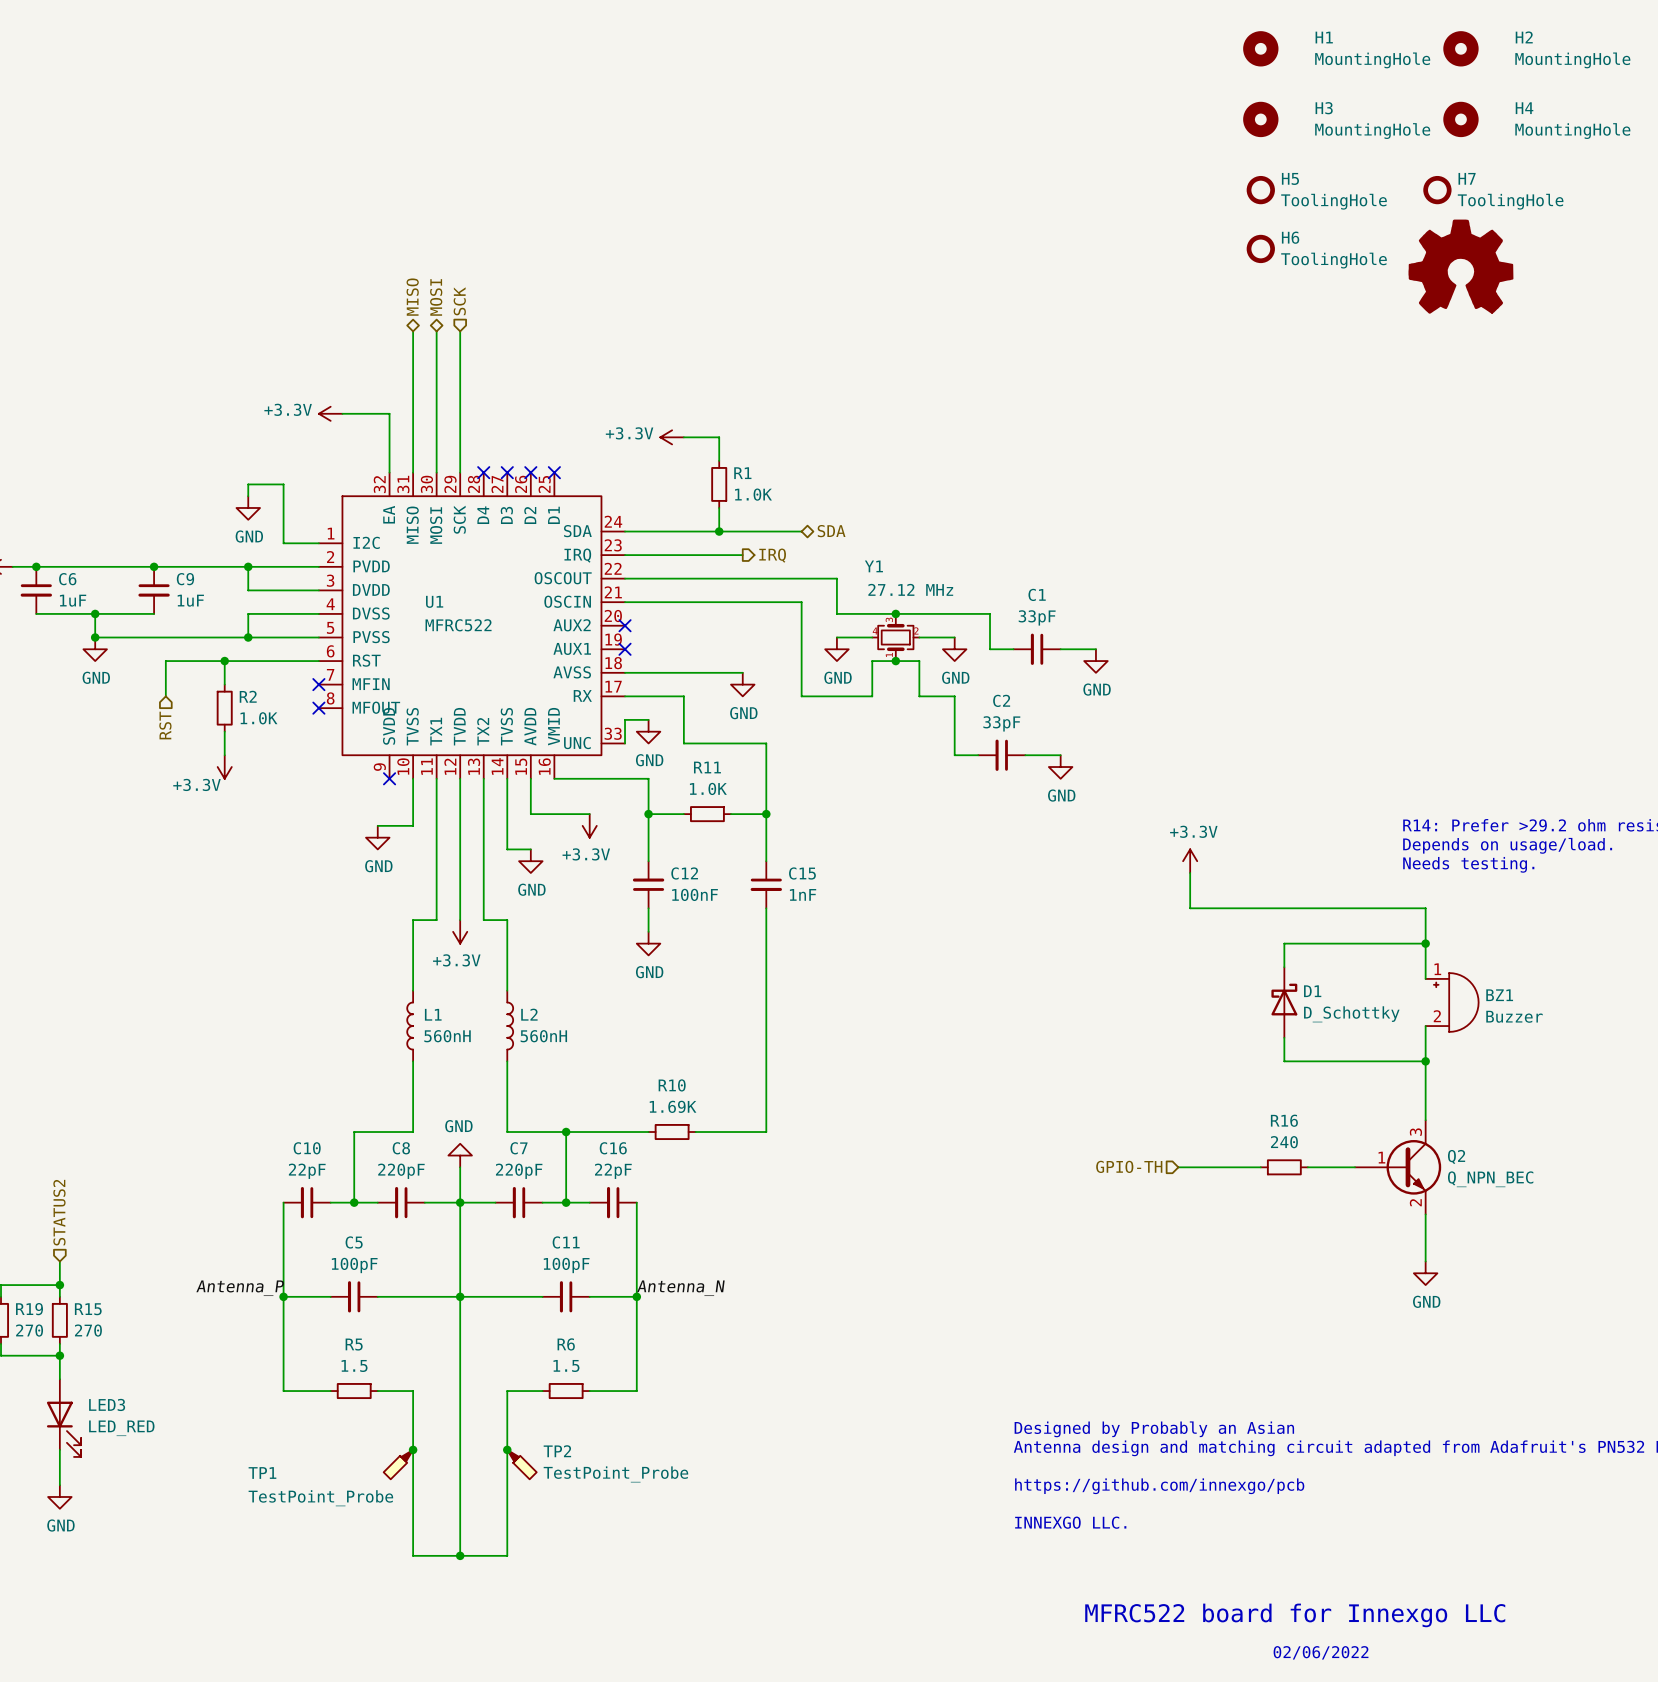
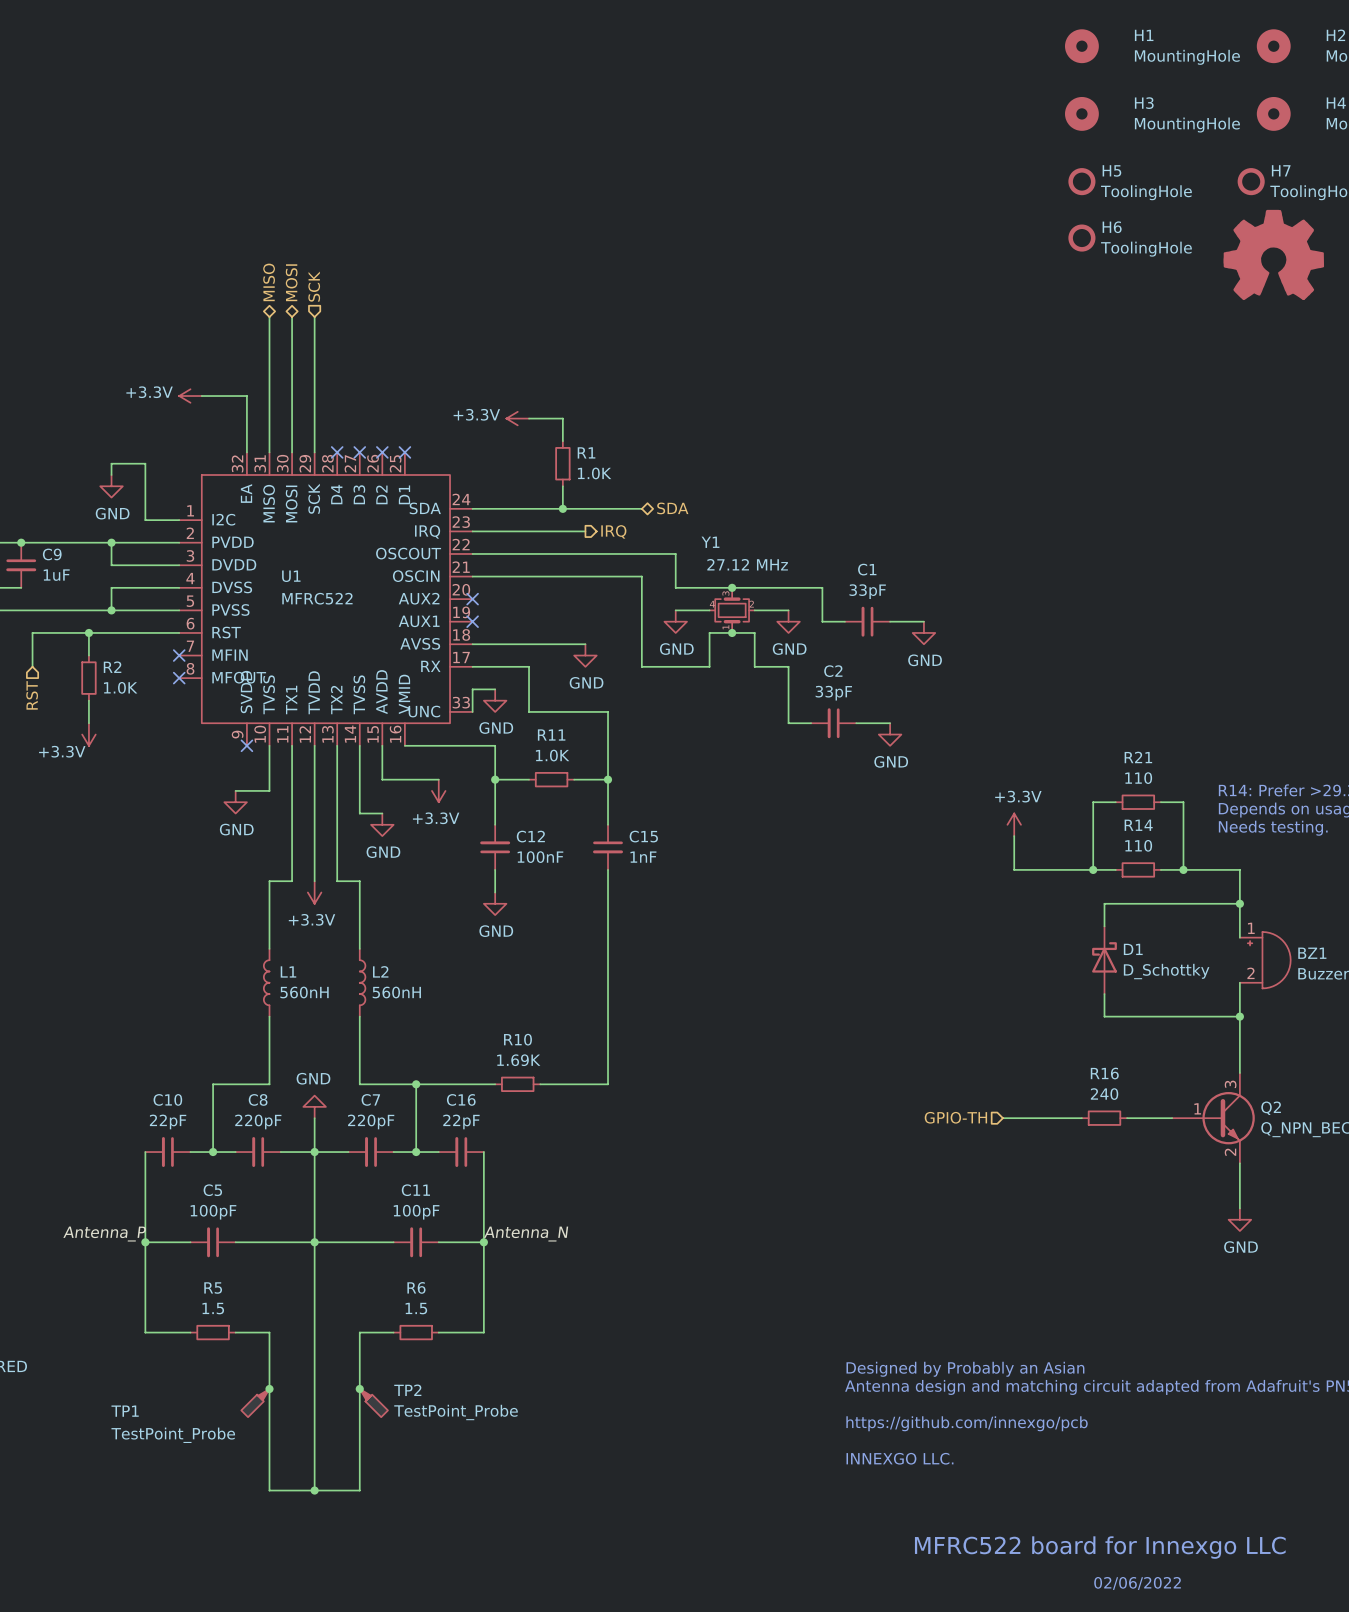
wire: none -> (1115, 802) (1093, 802) (1093, 869)
R21: none -> 110 (1138, 802)
wire: none -> (1160, 802) (1183, 802) (1183, 869)
junction: none -> (1093, 869)
wire: (1296, 908) (1343, 908) -> none
R14: none -> 110 (1138, 869)
junction: none -> (1183, 869)

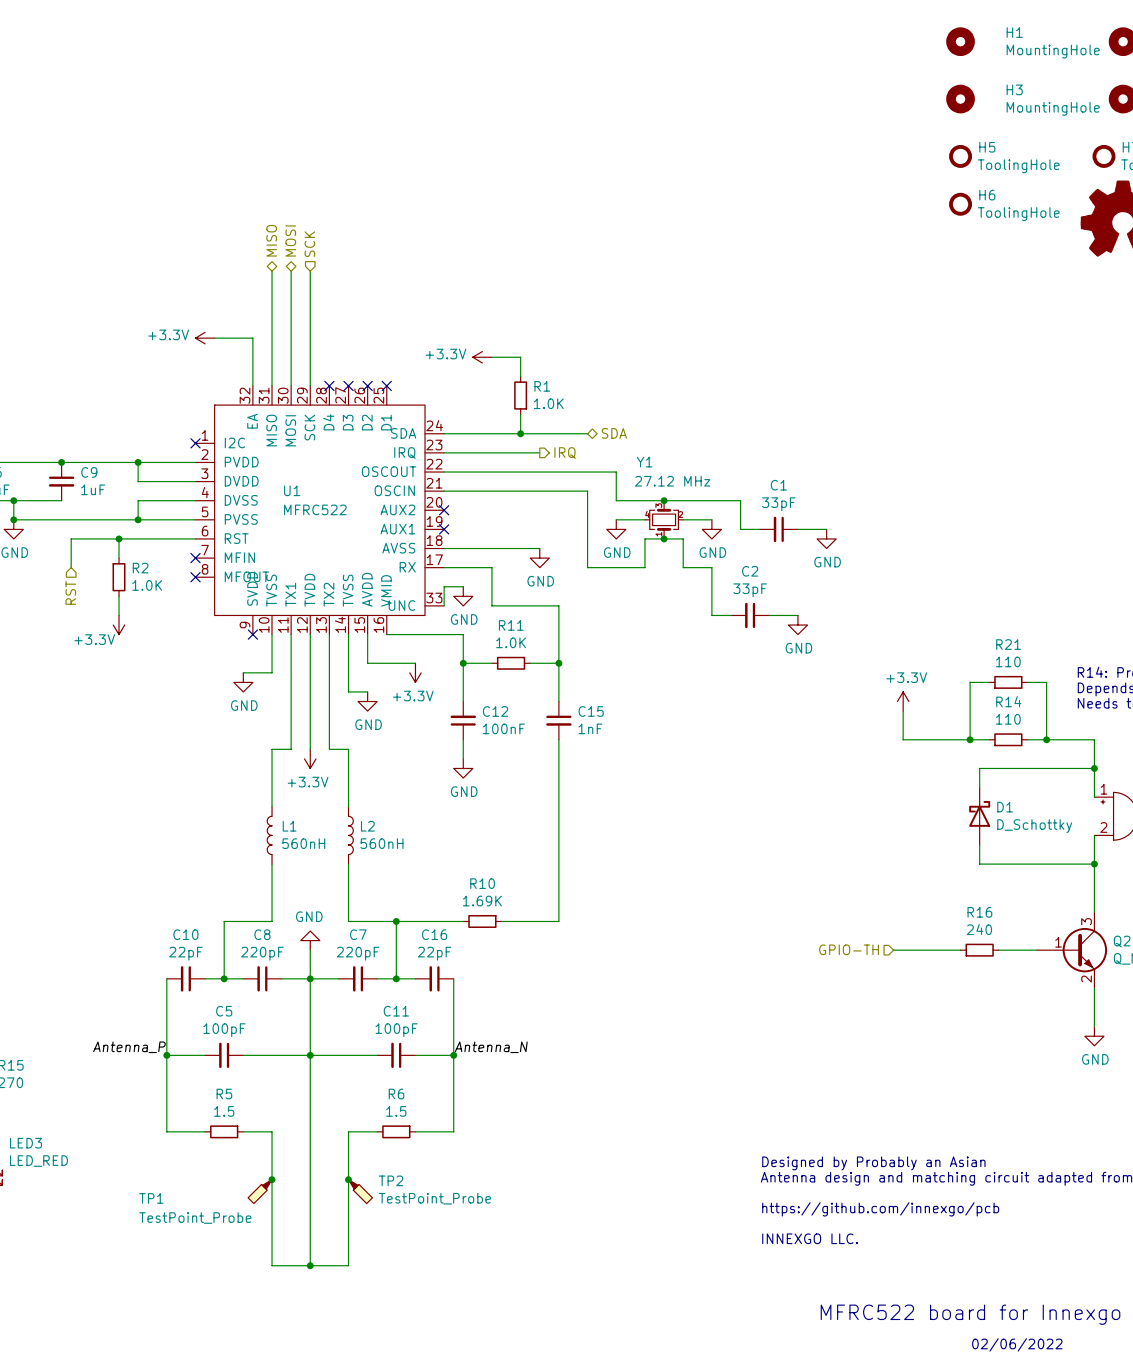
wire: (111, 475) (111, 463) (145, 463) (145, 520) (179, 520) -> none
power symbol: GND (111, 486) -> none
no-connect mark: none -> (195, 443)

